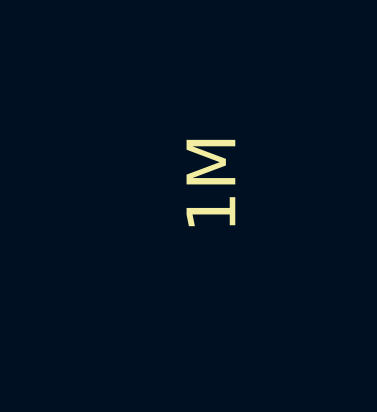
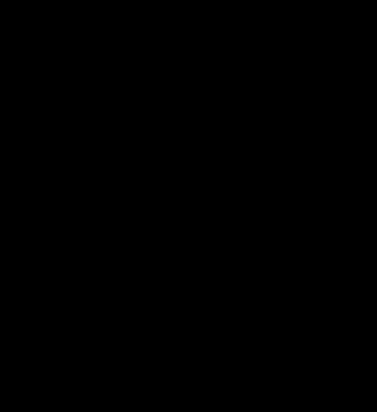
text: 1M (210, 183) -> none

